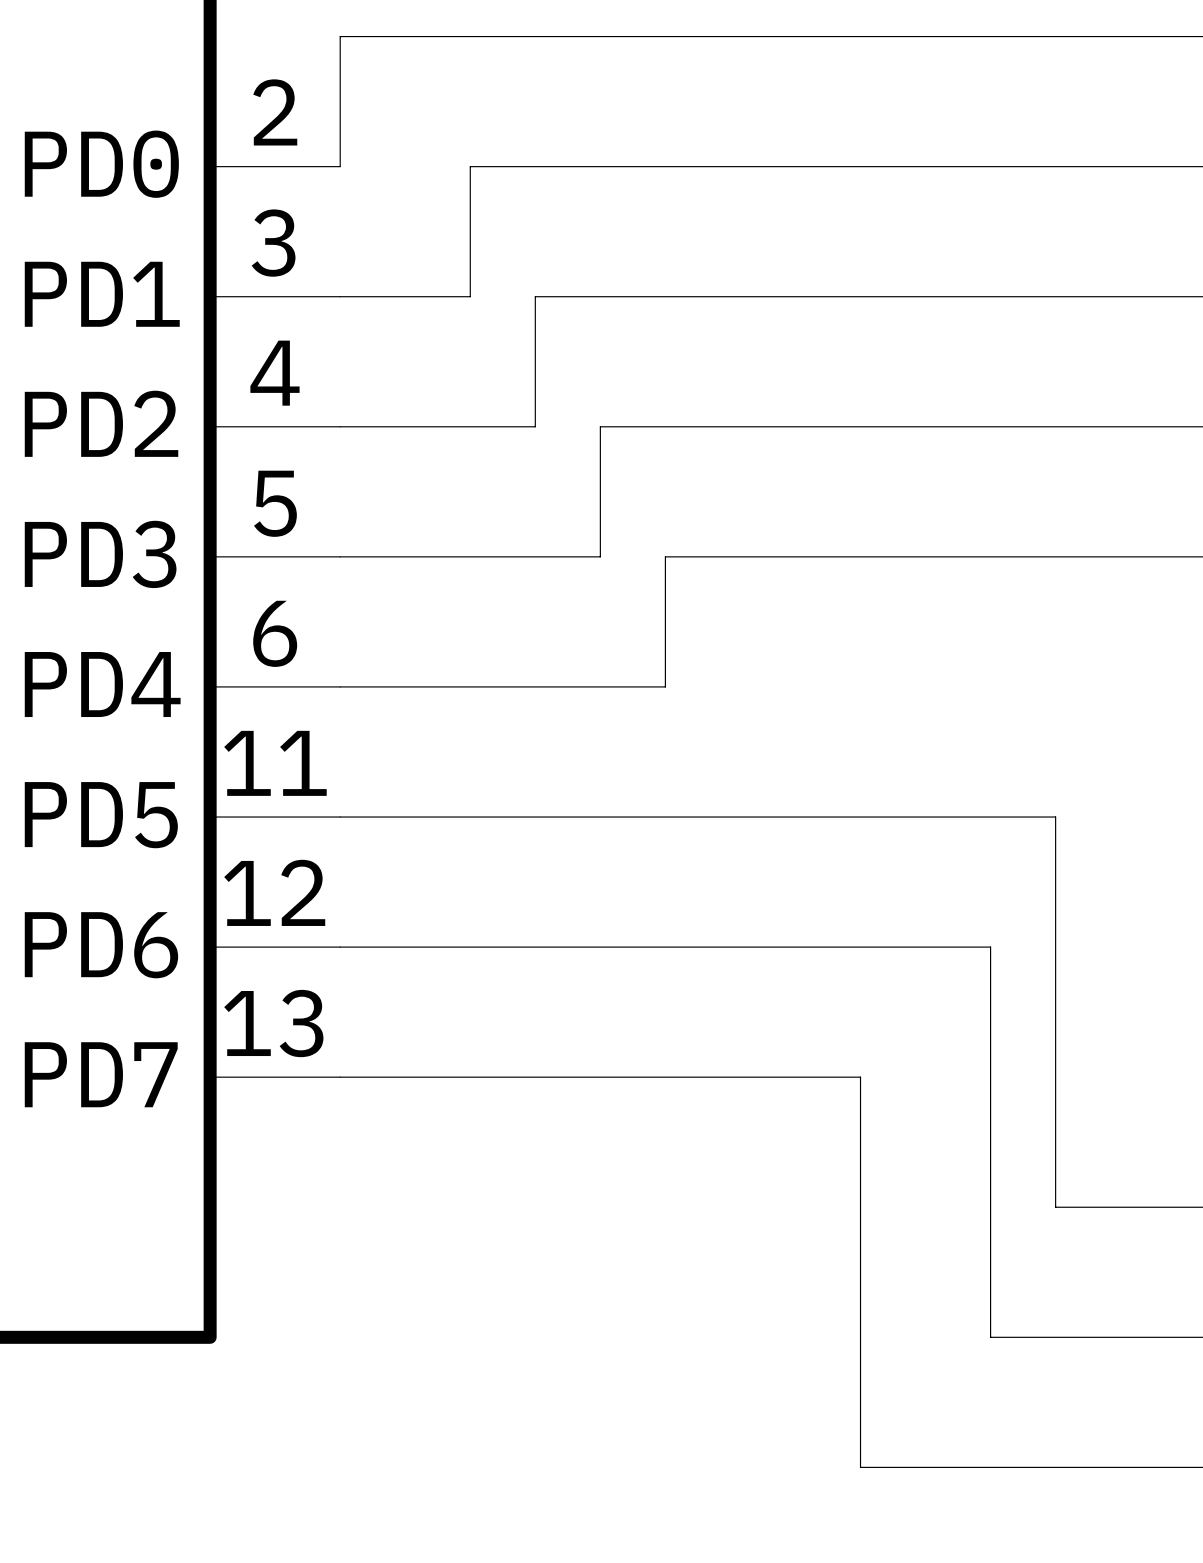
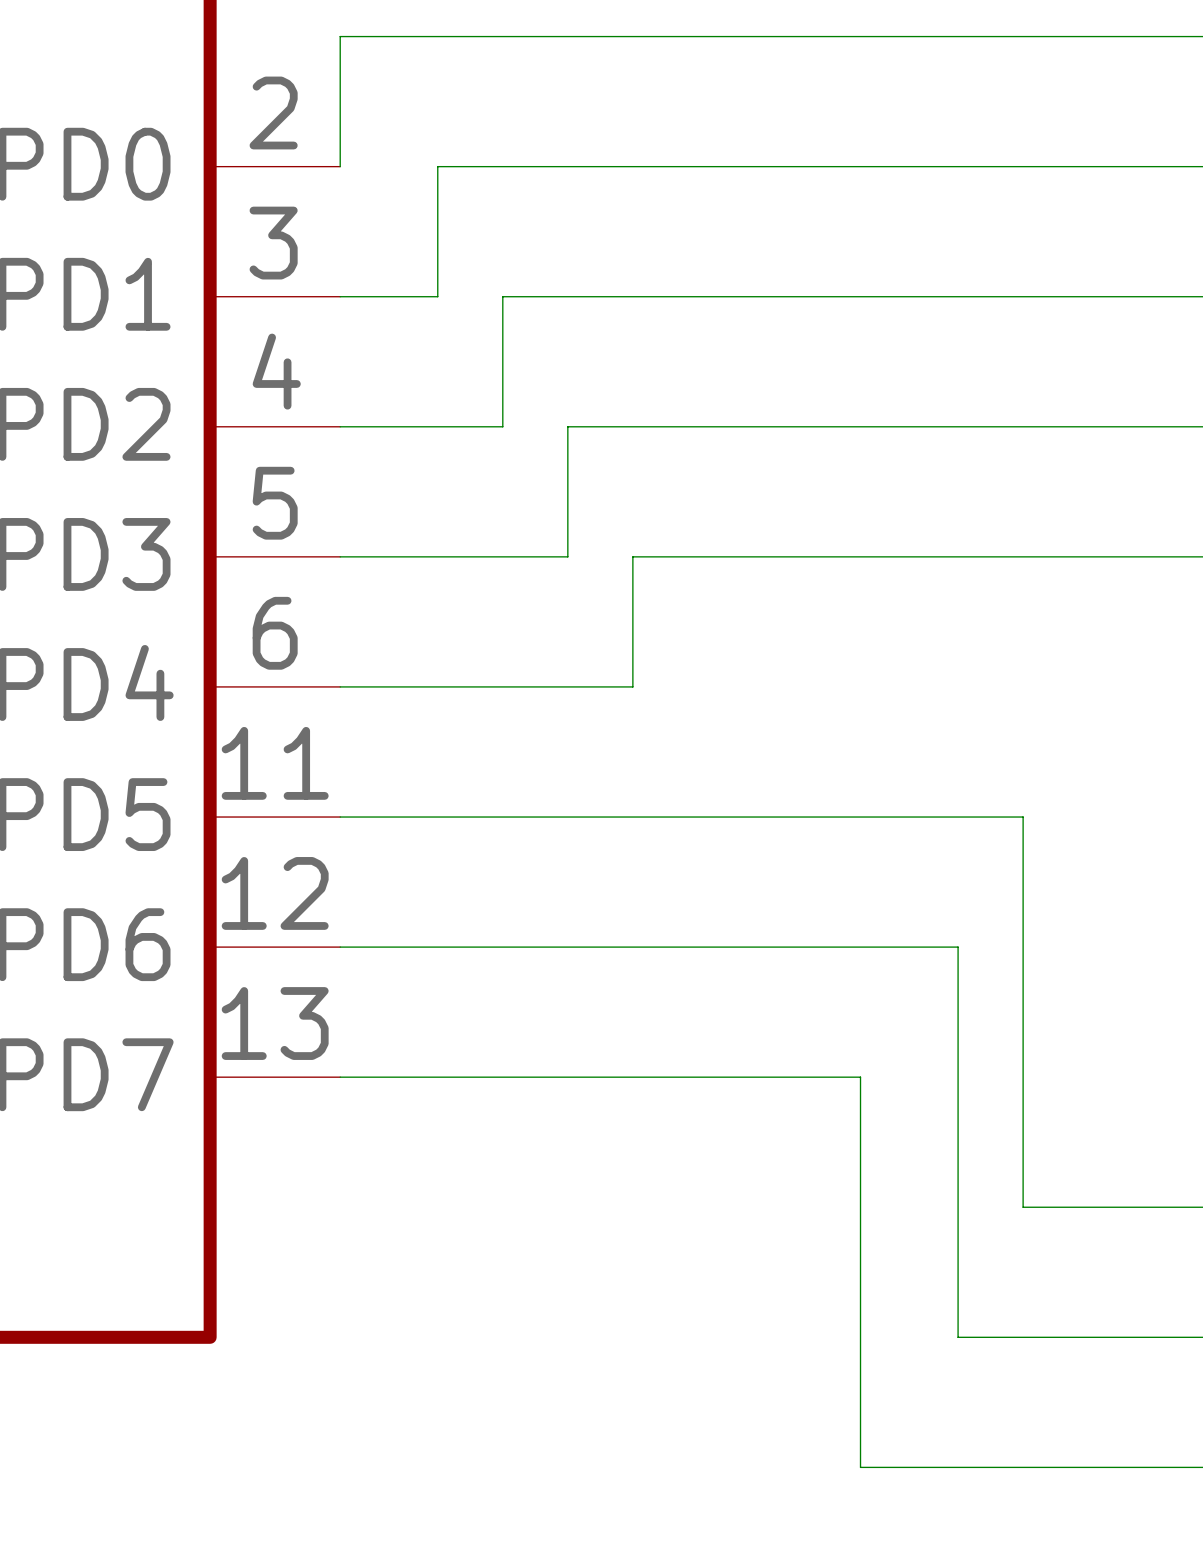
wire: (470, 166) (470, 296) (437, 296) -> (470, 166) (437, 166) (437, 296)
wire: (535, 296) (535, 426) (502, 426) -> (535, 296) (502, 296) (502, 426)
wire: (600, 426) (600, 556) (567, 556) -> (600, 426) (567, 426) (567, 556)
wire: (665, 556) (665, 686) (632, 686) -> (665, 556) (632, 556) (632, 686)
wire: (1023, 817) (1055, 817) (1055, 1207) -> (1023, 817) (1023, 1207) (1055, 1207)
wire: (958, 947) (990, 947) (990, 1337) -> (958, 947) (958, 1337) (990, 1337)

